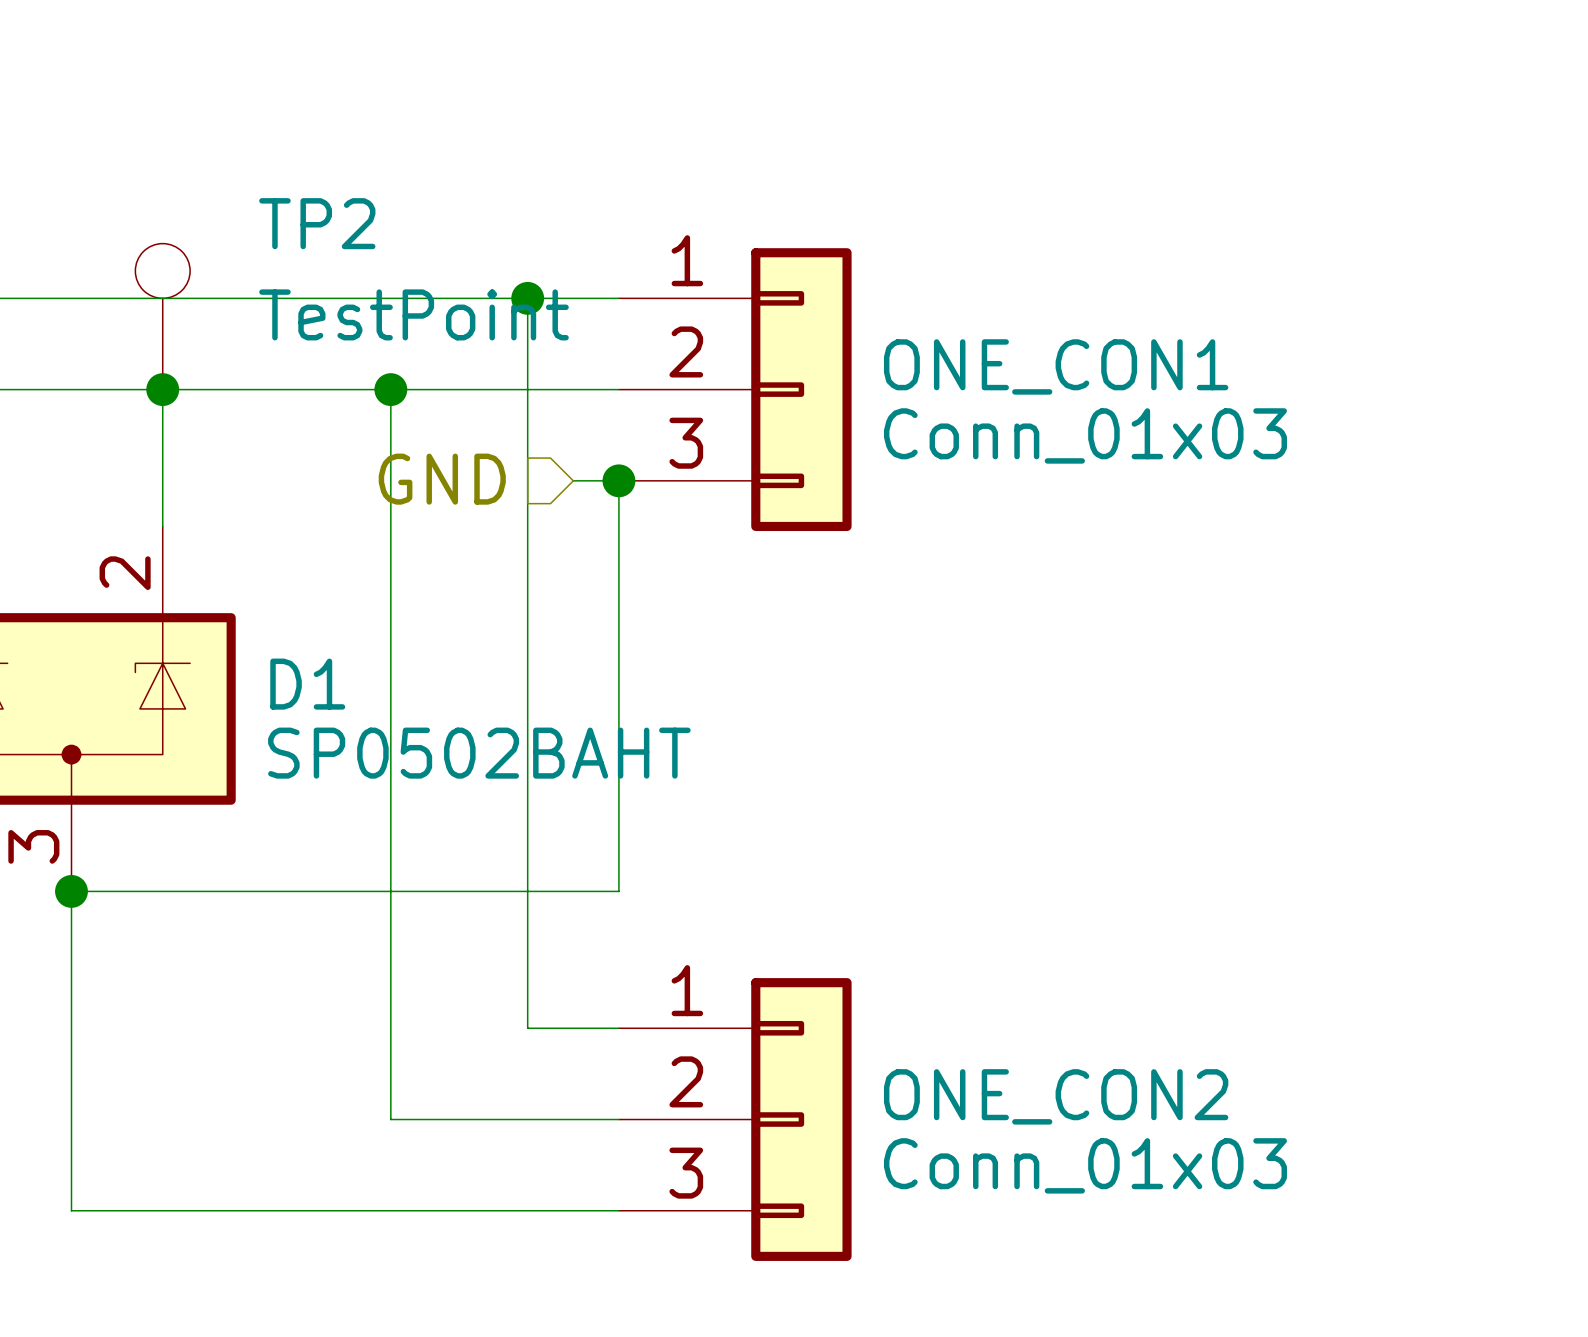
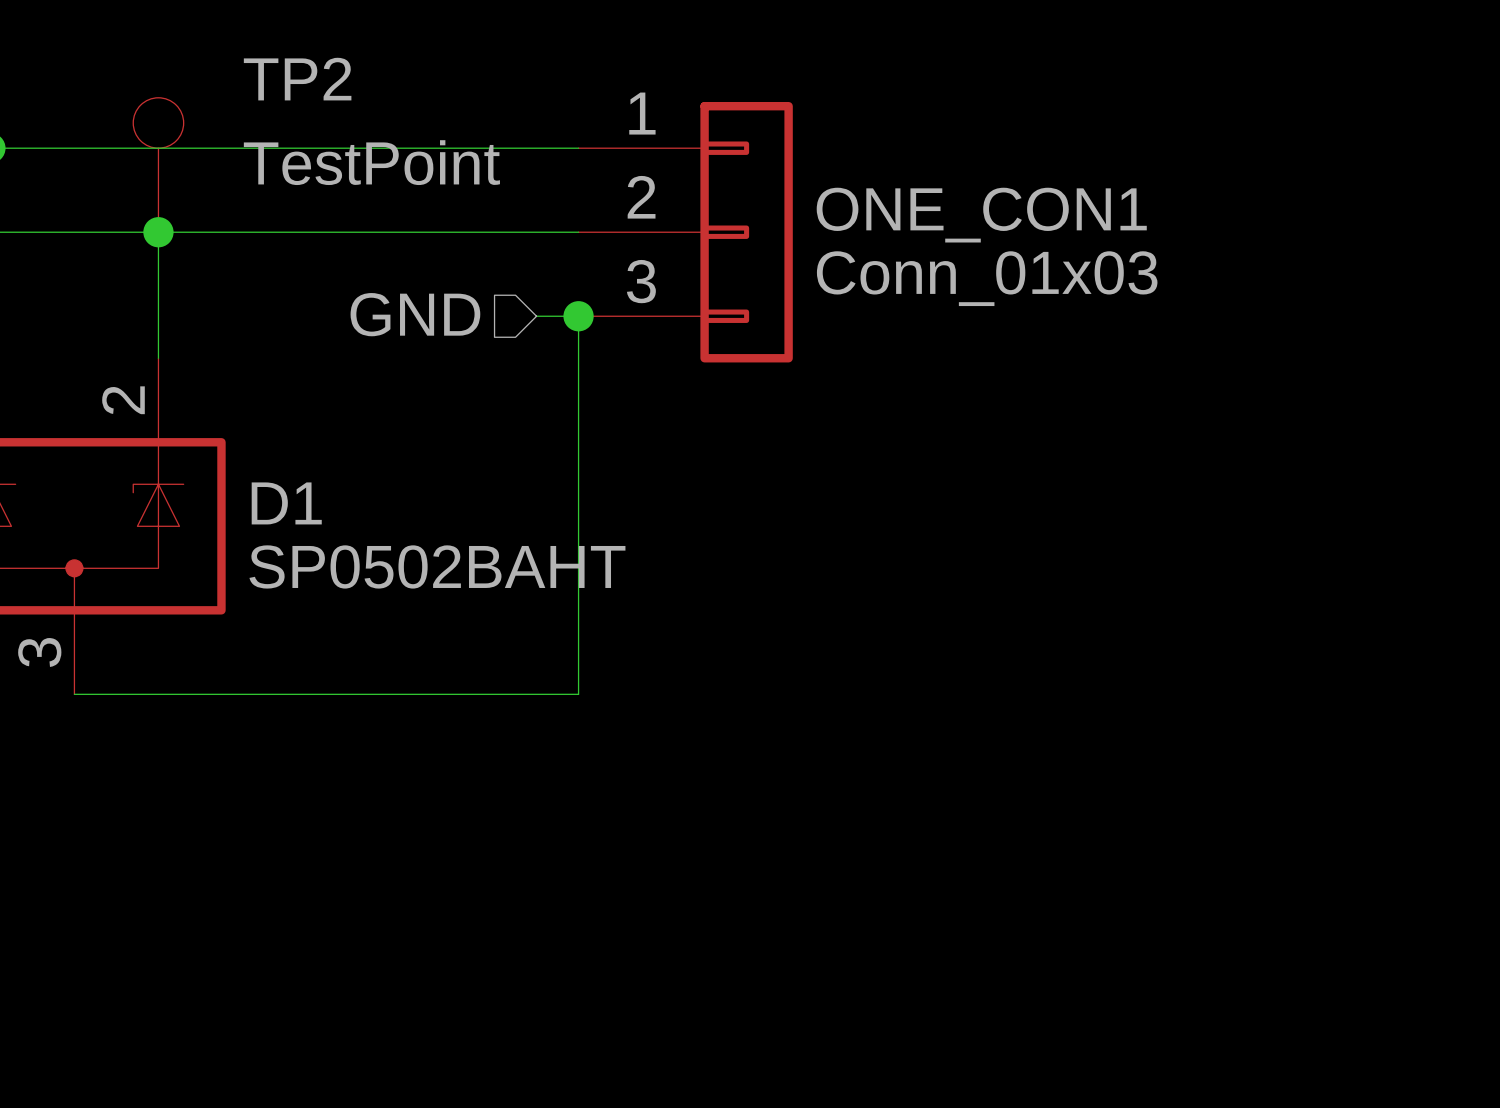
wire: (527, 298) (527, 1028) (618, 1028) -> none
junction: (527, 298) -> none
wire: (390, 389) (390, 1119) (618, 1119) -> none
junction: (390, 389) -> none
wire: (71, 891) (71, 1210) (618, 1210) -> none
junction: (71, 891) -> none
ONE_CON2: Conn_01x03 (735, 1119) -> none

